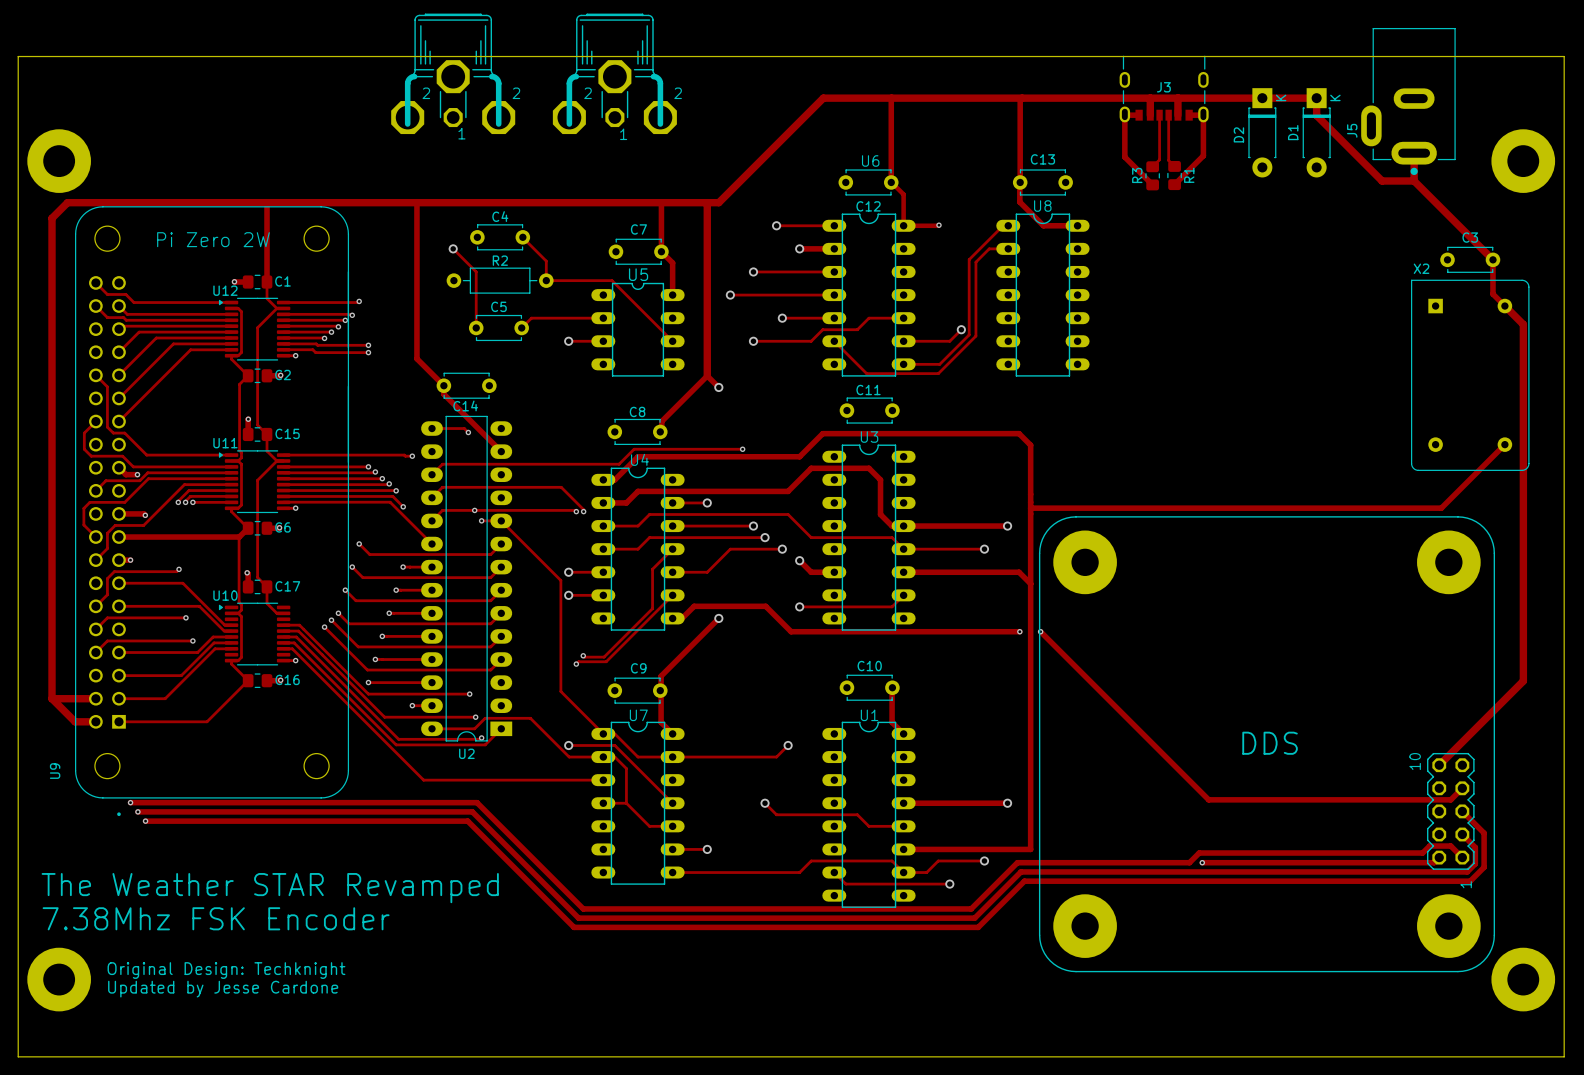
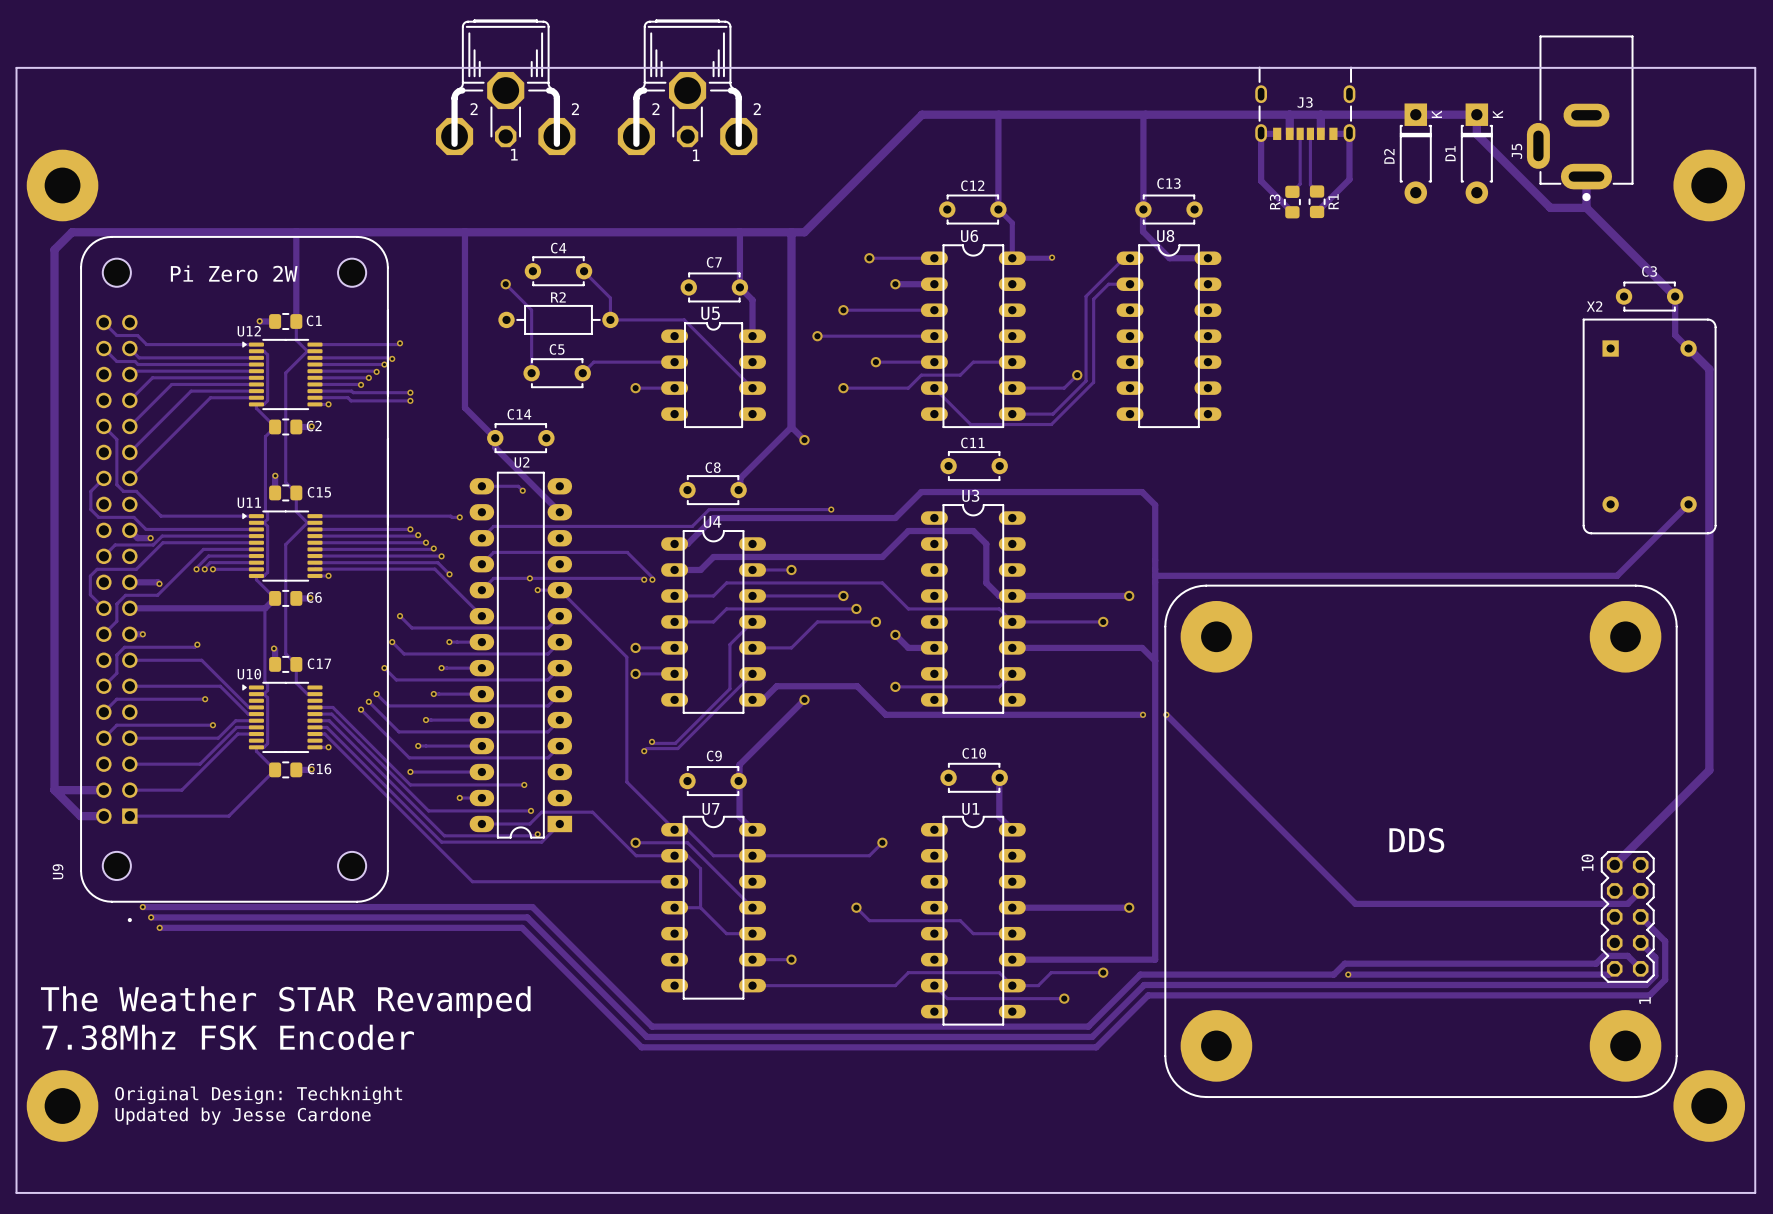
U6 name position: U6 (870, 160) -> U6 (969, 236)
C12 name position: C12 (868, 206) -> C12 (972, 185)
C14 name position: C14 (465, 405) -> C14 (519, 414)
U2 name position: U2 (466, 753) -> U2 (522, 462)

